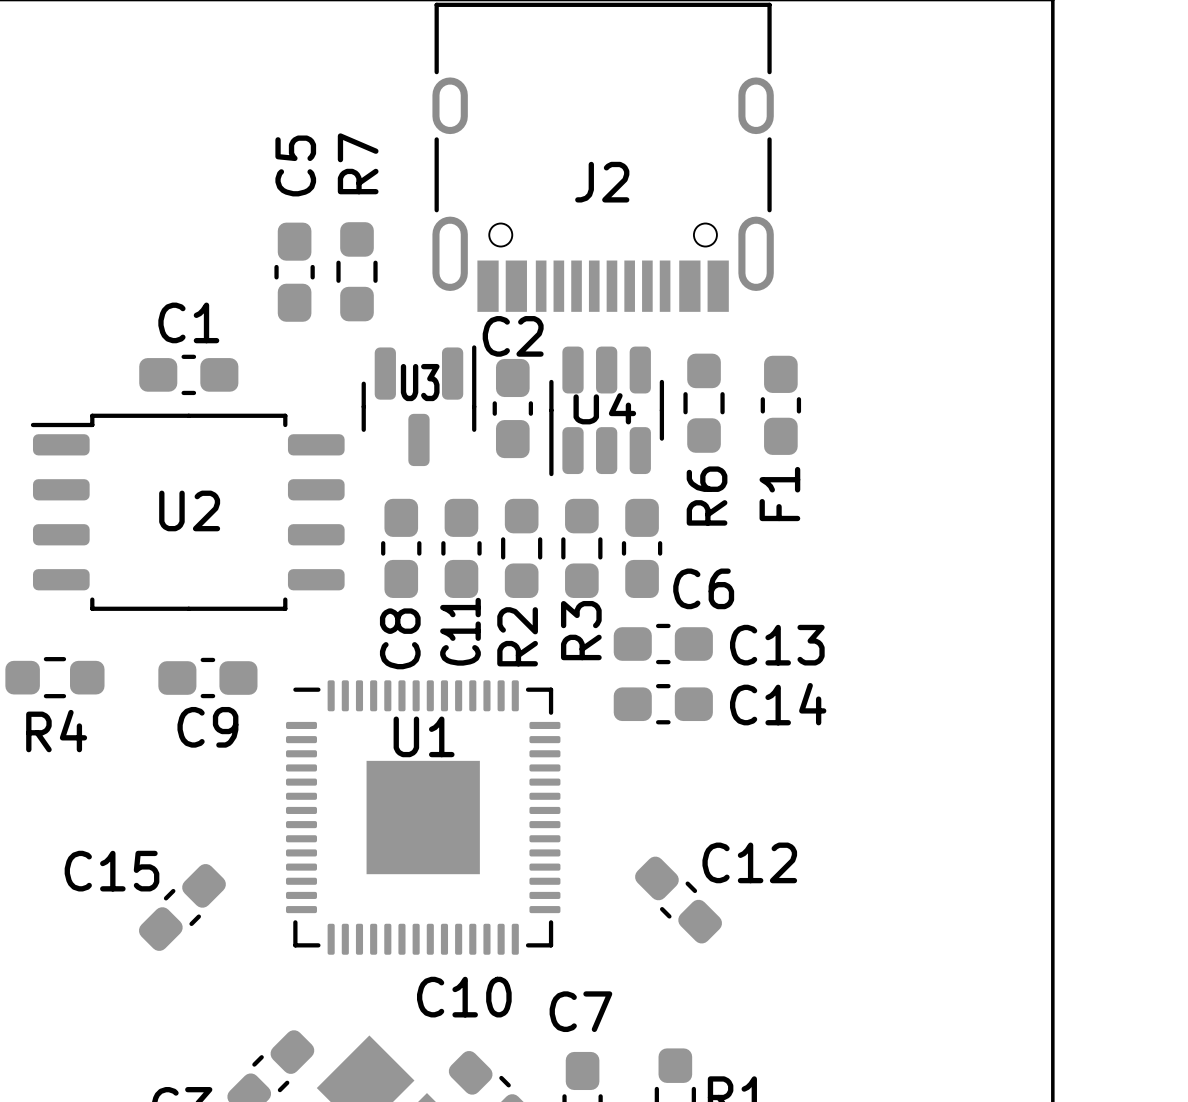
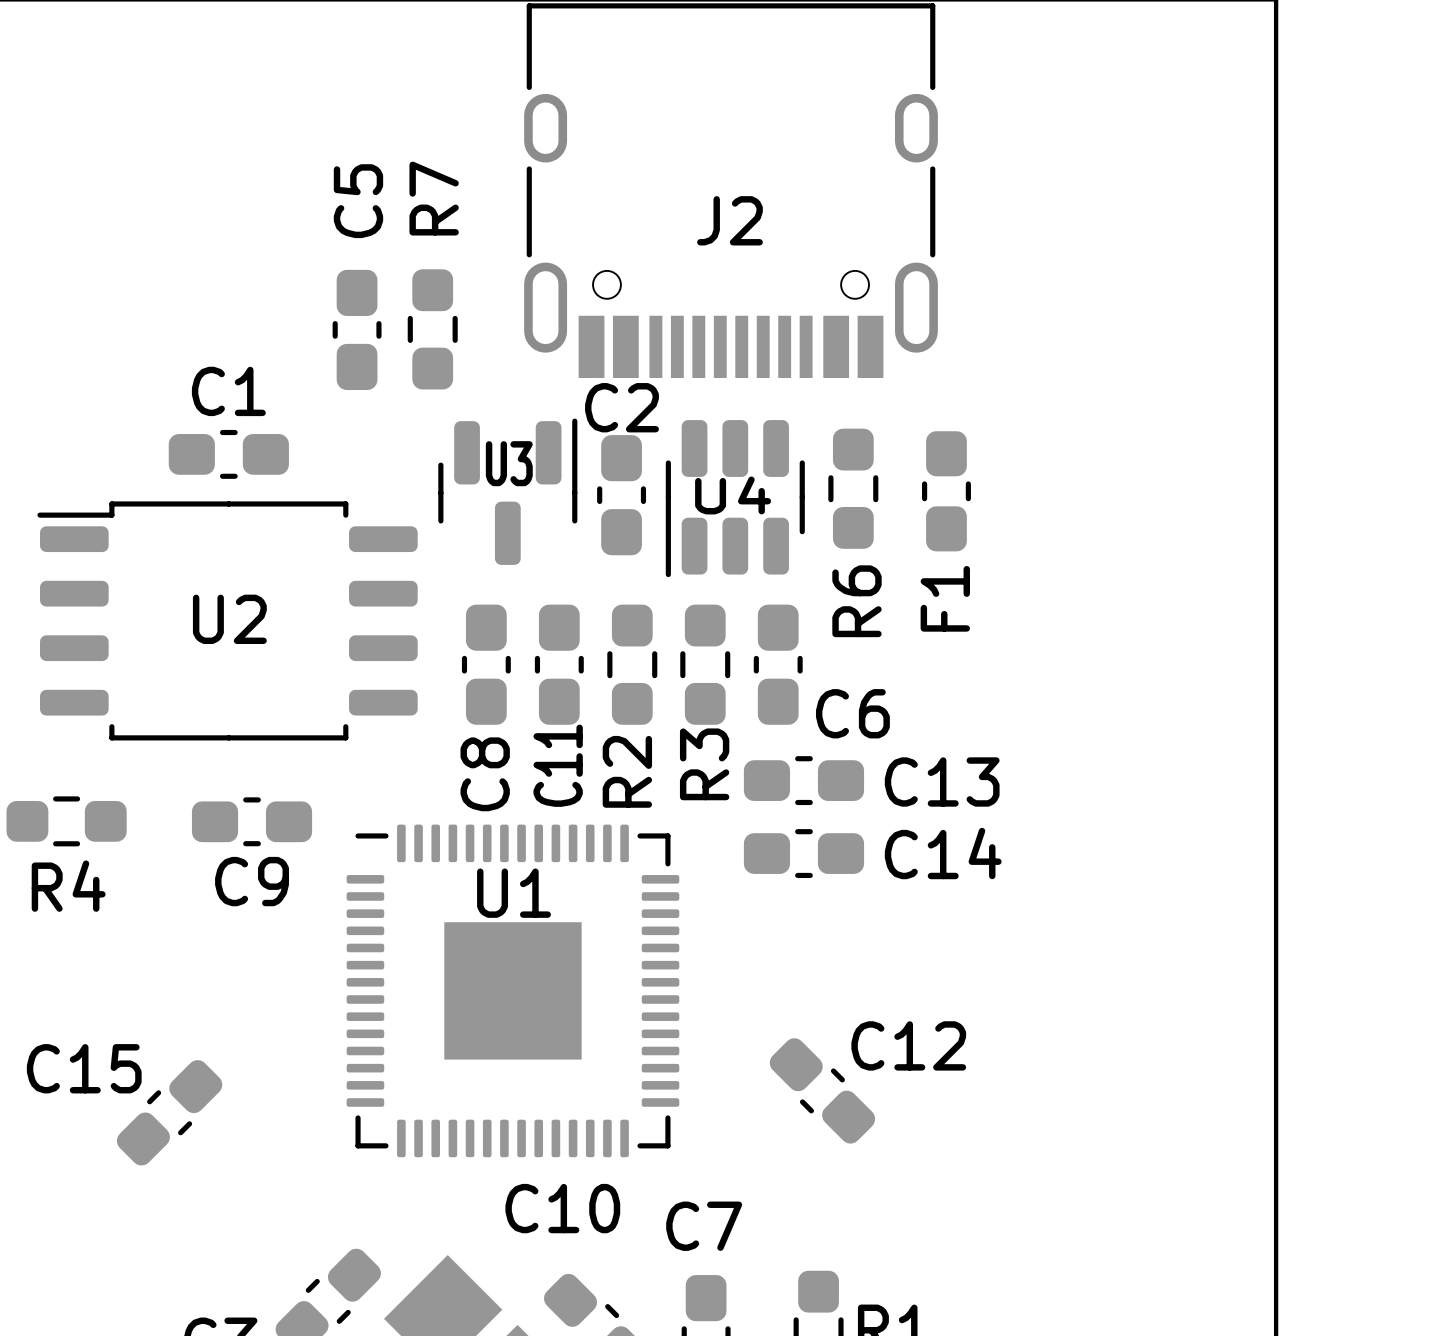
C15 position: (182, 907) -> (169, 1112)

